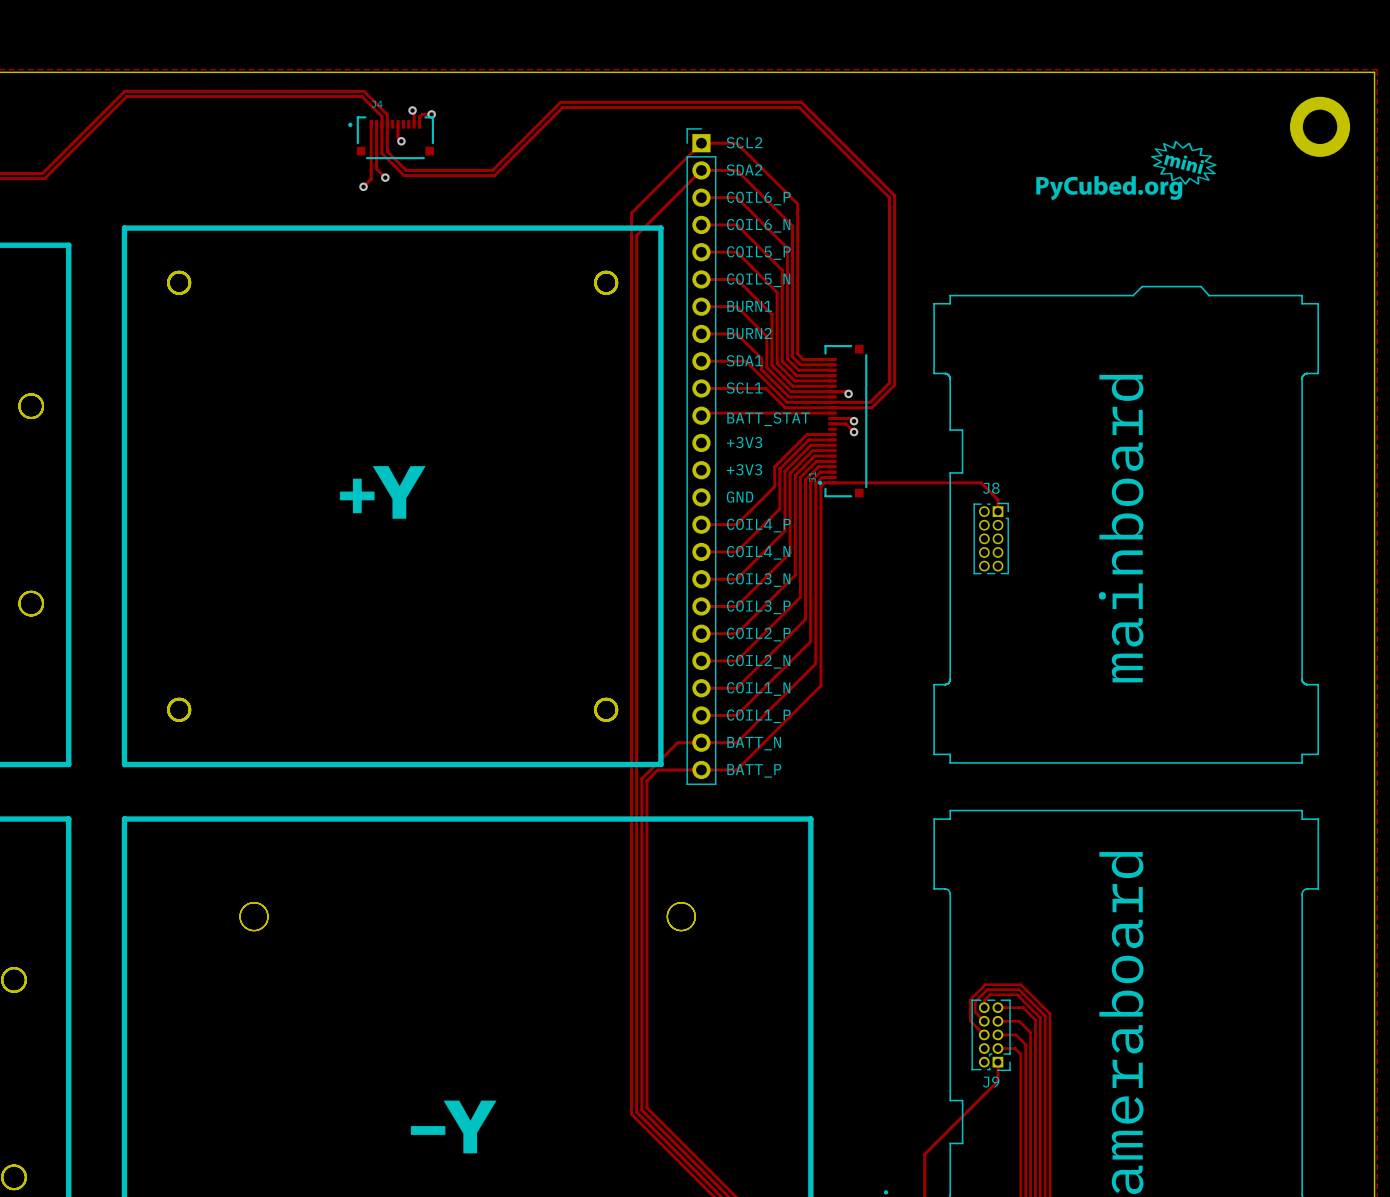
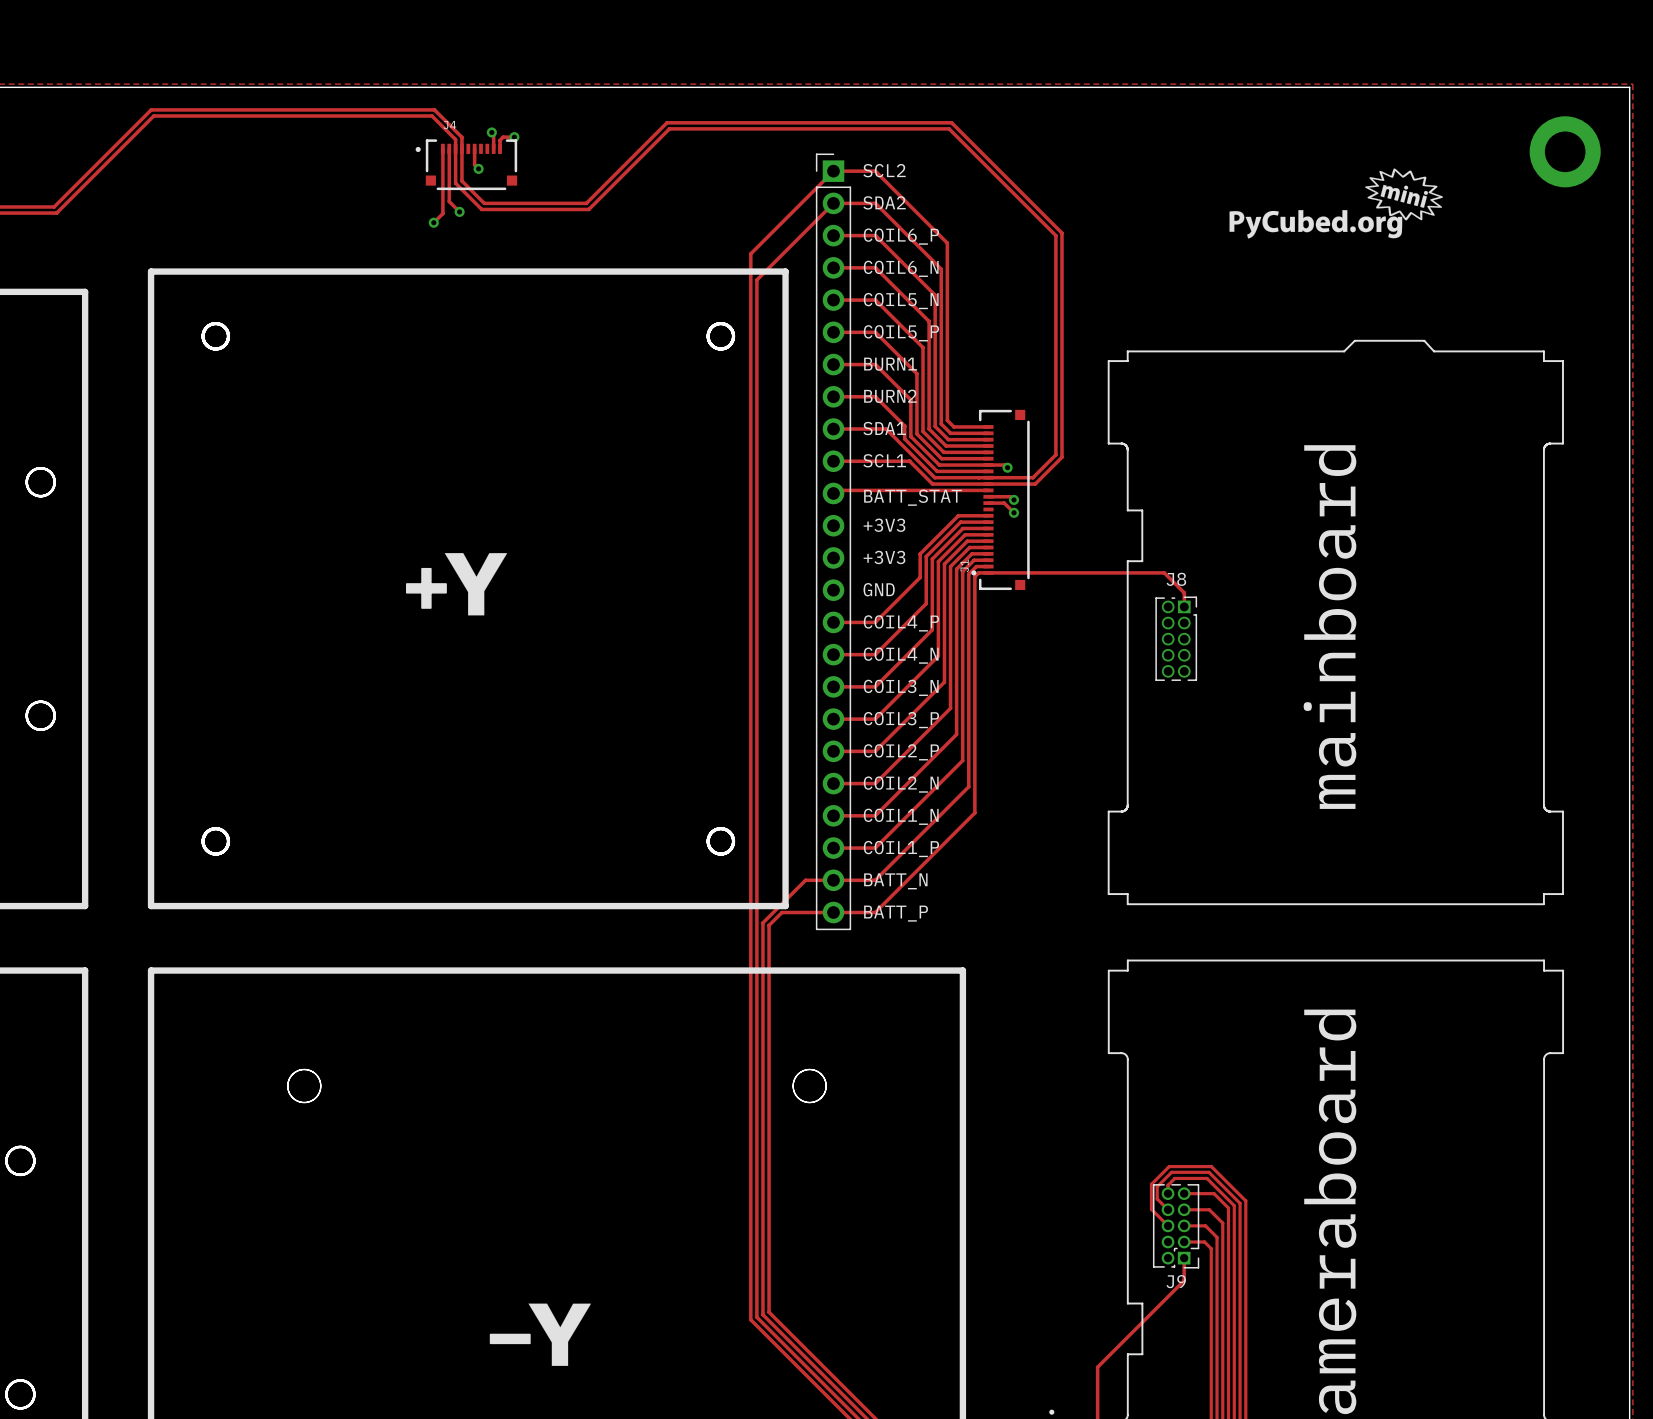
text: COIL5_P (758, 253) -> COIL5_N (901, 301)
text: COIL5_N (758, 280) -> COIL5_P (901, 333)

